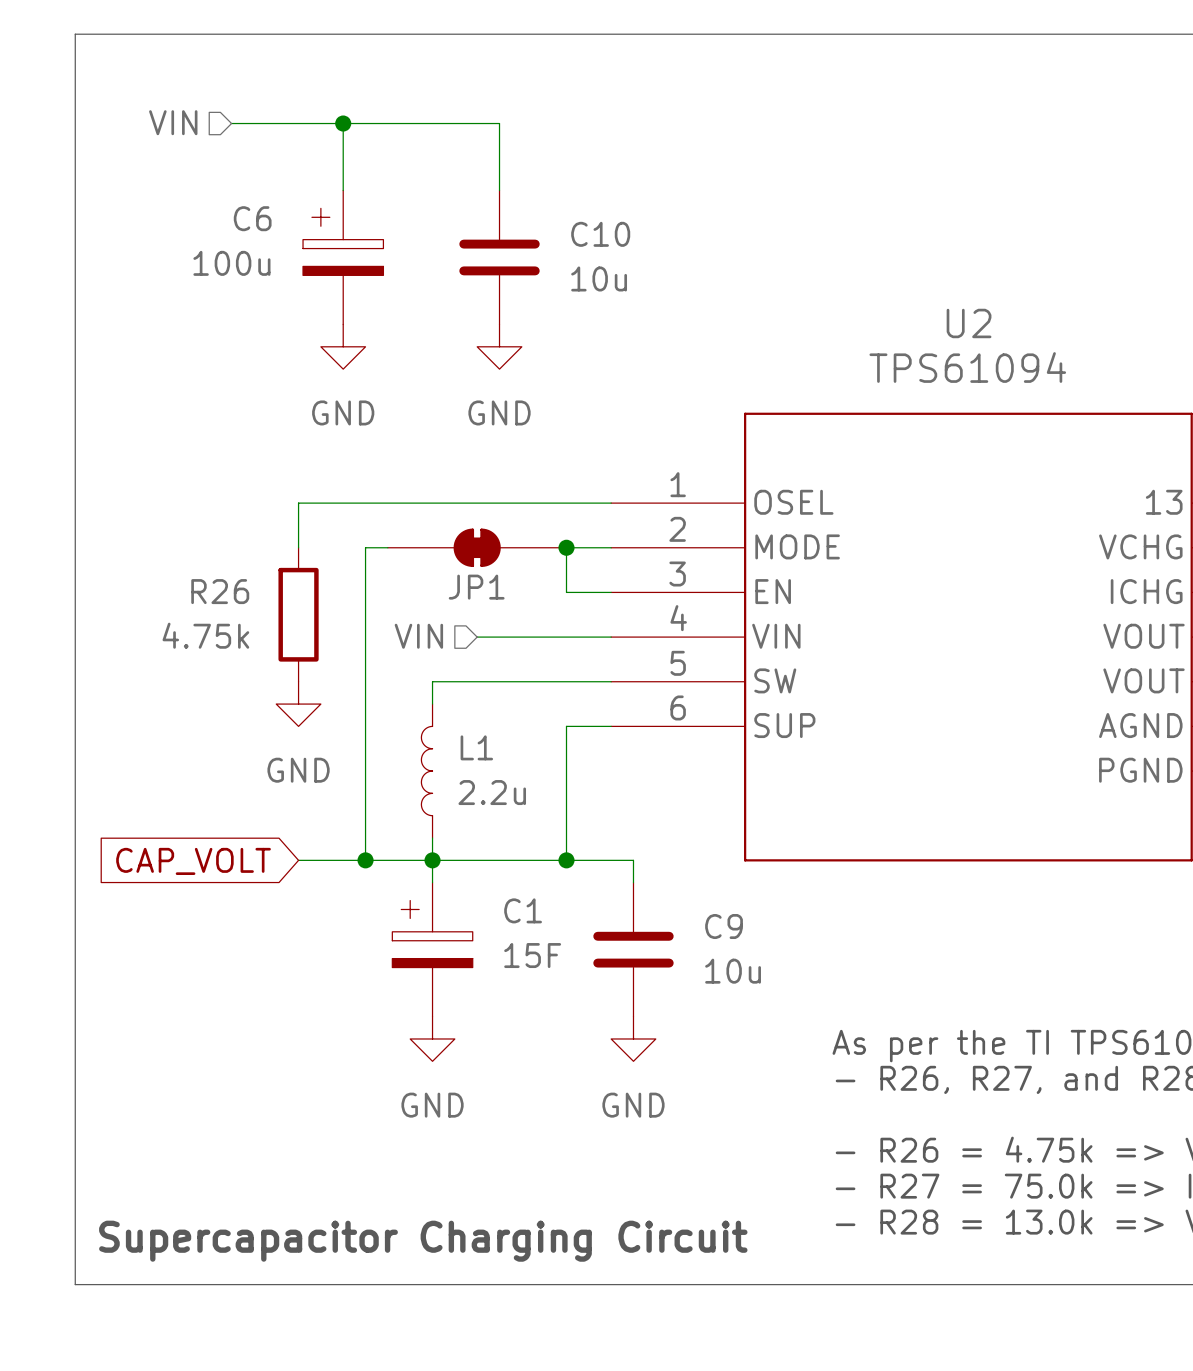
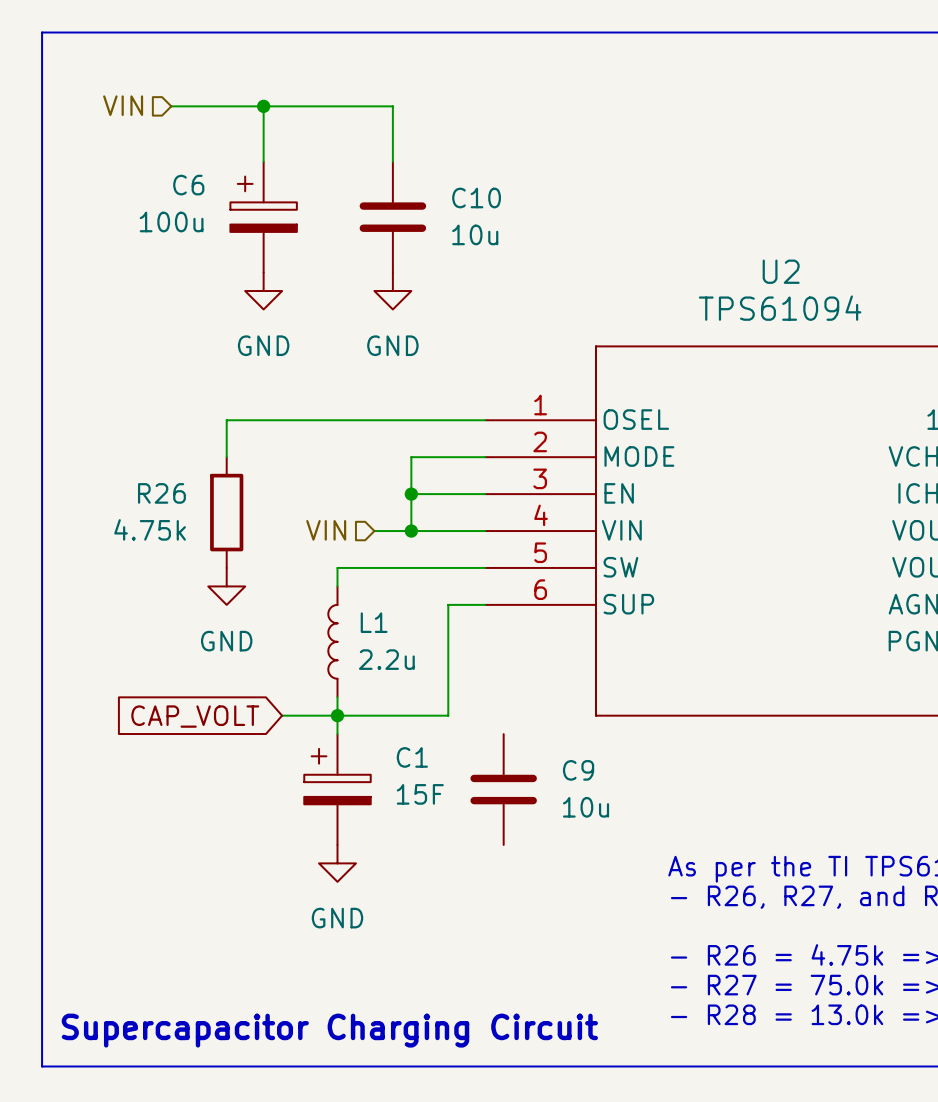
wire: (387, 547) (365, 547) (365, 860) (298, 860) -> none
JP1: (477, 547) -> none
wire: (566, 547) (566, 592) -> (448, 457) (411, 457) (411, 531)
junction: (566, 547) -> none
wire: none -> (411, 494) (448, 494)
junction: none -> (411, 494)
junction: none -> (411, 531)
junction: (365, 860) -> none
wire: (566, 860) (633, 860) (633, 882) -> none
junction: (566, 860) -> none
global label position: CAP_VOLT (193, 861) -> CAP_VOLT (195, 716)
power symbol: GND (633, 1038) -> none

